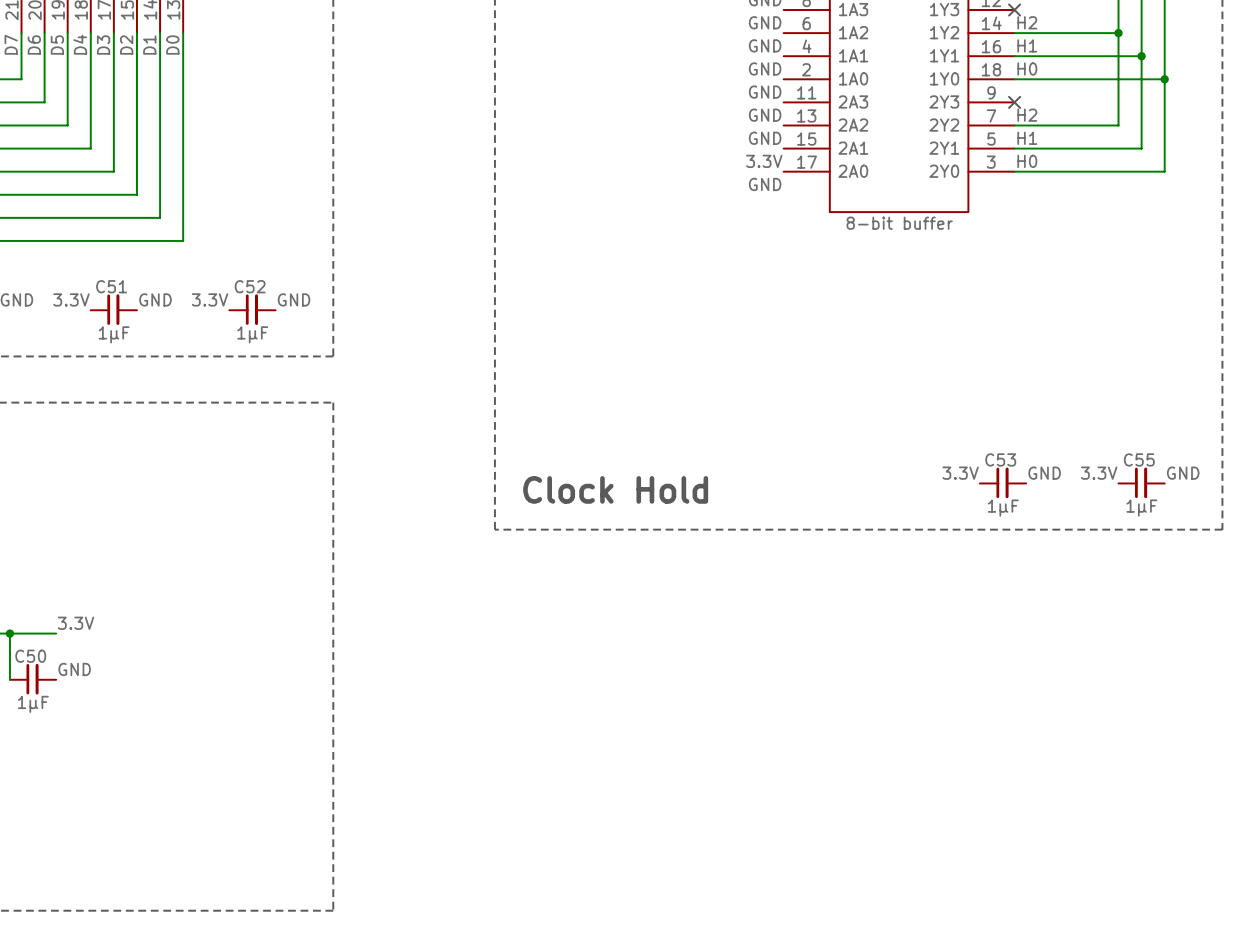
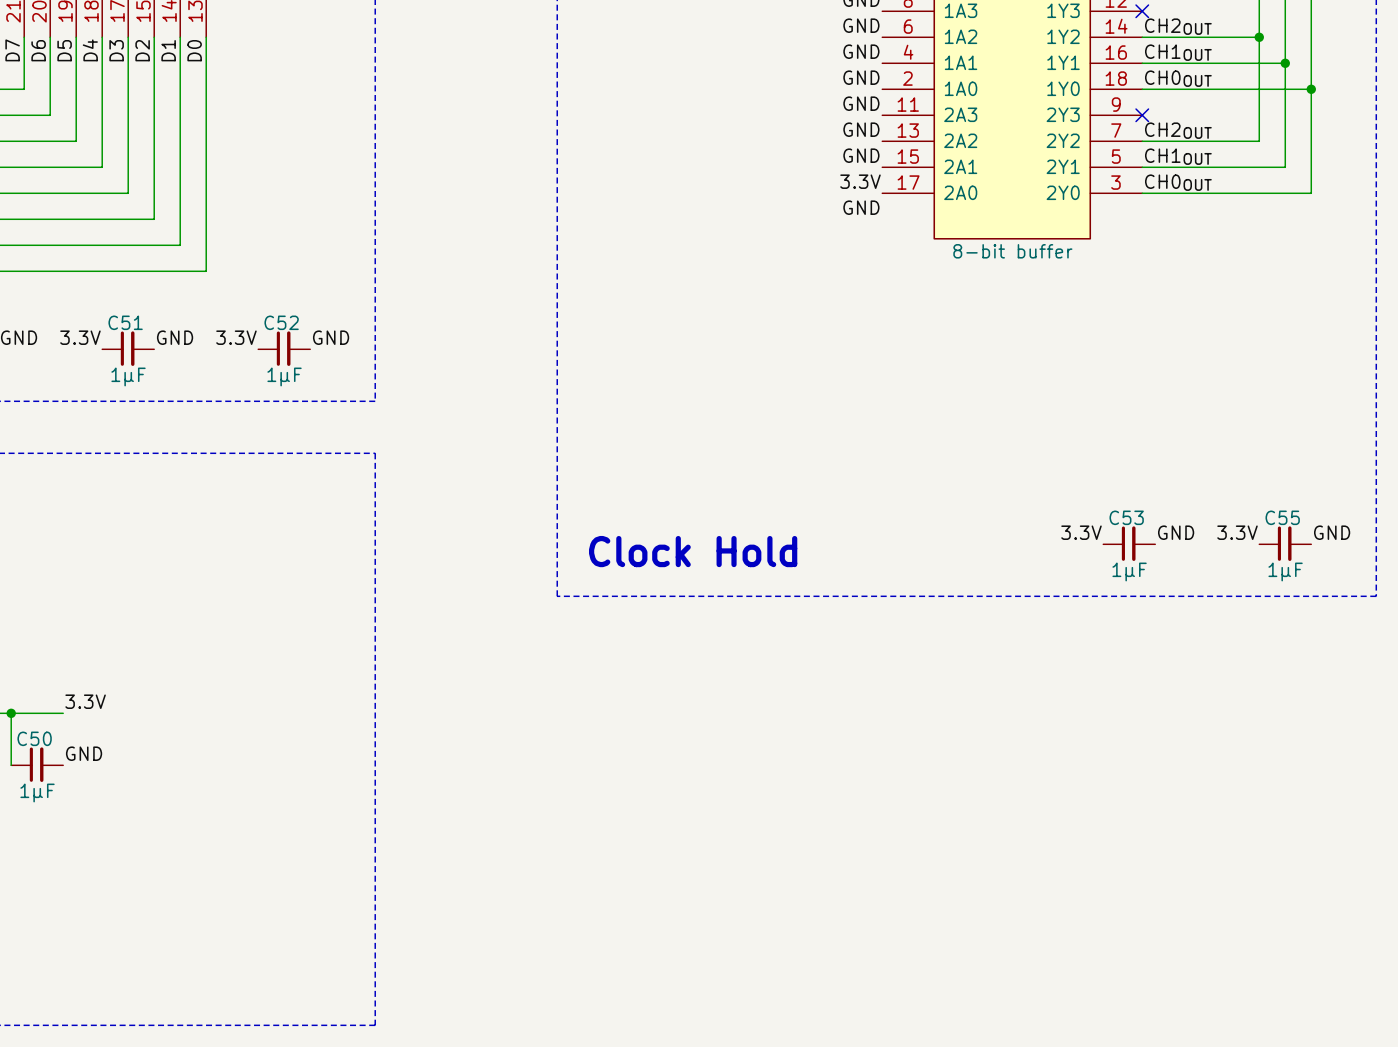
label: H2 (1027, 22) -> CH2OUT (1178, 26)
label: H1 (1027, 45) -> CH1OUT (1178, 52)
label: H0 (1027, 68) -> CH0OUT (1178, 78)
label: H2 (1027, 115) -> CH2OUT (1178, 130)
label: H1 (1027, 138) -> CH1OUT (1178, 156)
label: H0 (1027, 161) -> CH0OUT (1178, 182)

